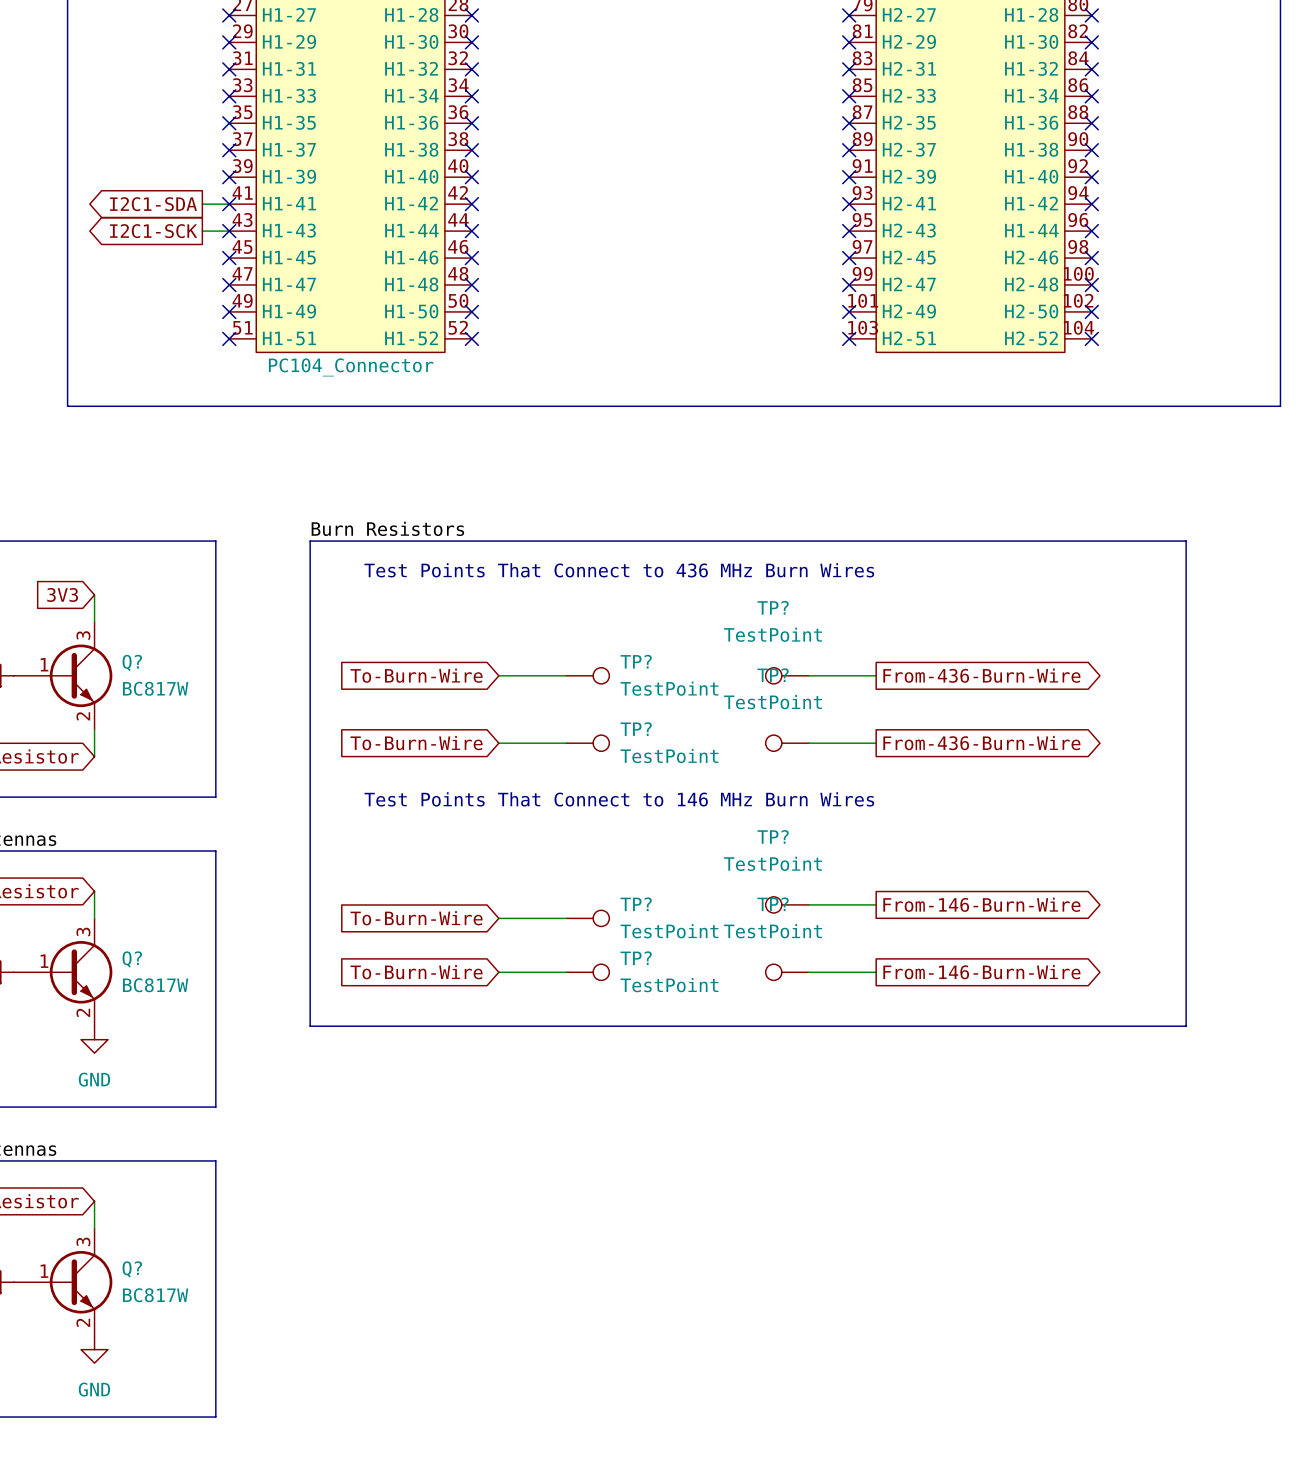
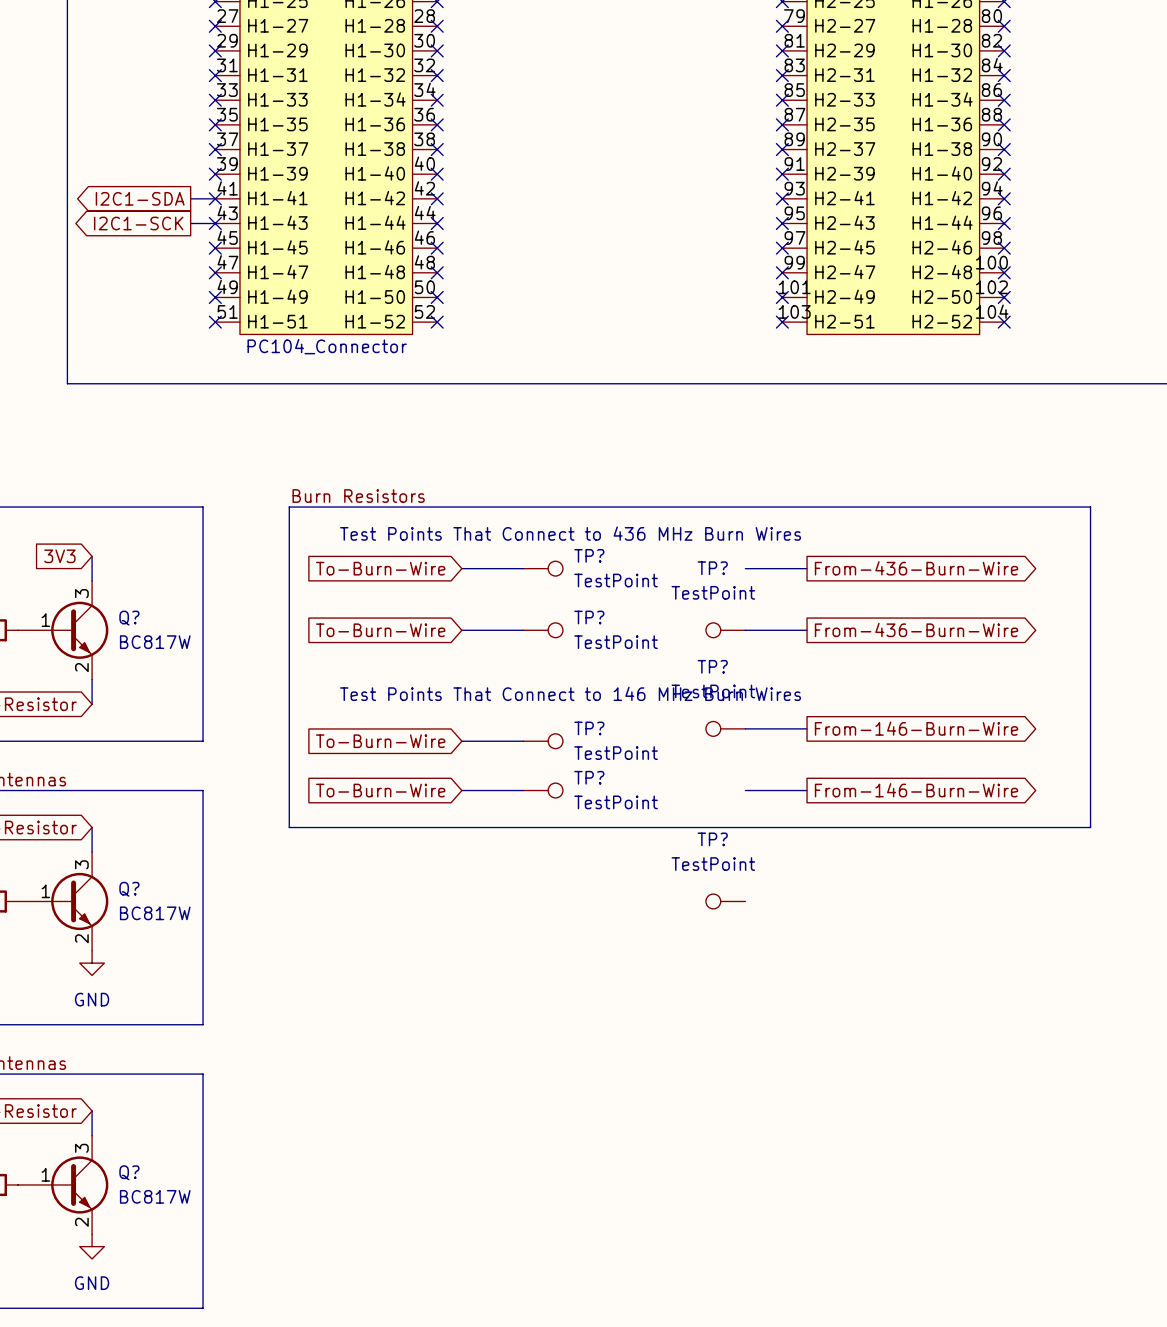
global label: none -> To-Burn-Wire (380, 568)
TP?: none -> TestPoint (543, 568)
global label: To-Burn-Wire (416, 743) -> none
wire: (498, 743) (566, 743) -> (461, 568) (523, 568)
TP?: TestPoint (587, 743) -> none
TP? position: (787, 743) -> (725, 728)
wire: (808, 743) (876, 743) -> (745, 568) (807, 568)
global label position: From-436-Burn-Wire (981, 743) -> From-436-Burn-Wire (916, 568)
global label: none -> From-146-Burn-Wire (916, 728)
global label: none -> To-Burn-Wire (380, 741)
TP?: none -> TestPoint (543, 741)
text position: Test Points That Connect to 146 MHz Burn Wires (619, 799) -> Test Points That Connect to 146 MHz Burn Wires (570, 693)
global label: none -> To-Burn-Wire (380, 790)
TP?: none -> TestPoint (543, 790)
line: (310, 891) (310, 1026) (1186, 1026) (1186, 891) -> (289, 827) (1090, 827)
TP?: TestPoint (787, 904) -> none
wire: (808, 904) (876, 904) -> (745, 728) (807, 728)
global label position: From-146-Burn-Wire (981, 904) -> From-146-Burn-Wire (916, 790)
global label: To-Burn-Wire (416, 918) -> none
wire: (498, 918) (566, 918) -> (461, 741) (523, 741)
TP?: TestPoint (587, 918) -> none
global label: To-Burn-Wire (416, 972) -> none
wire: (498, 972) (566, 972) -> (461, 790) (523, 790)
TP?: TestPoint (587, 972) -> none
wire: (808, 972) (876, 972) -> (745, 790) (807, 790)
global label: From-146-Burn-Wire (981, 972) -> none

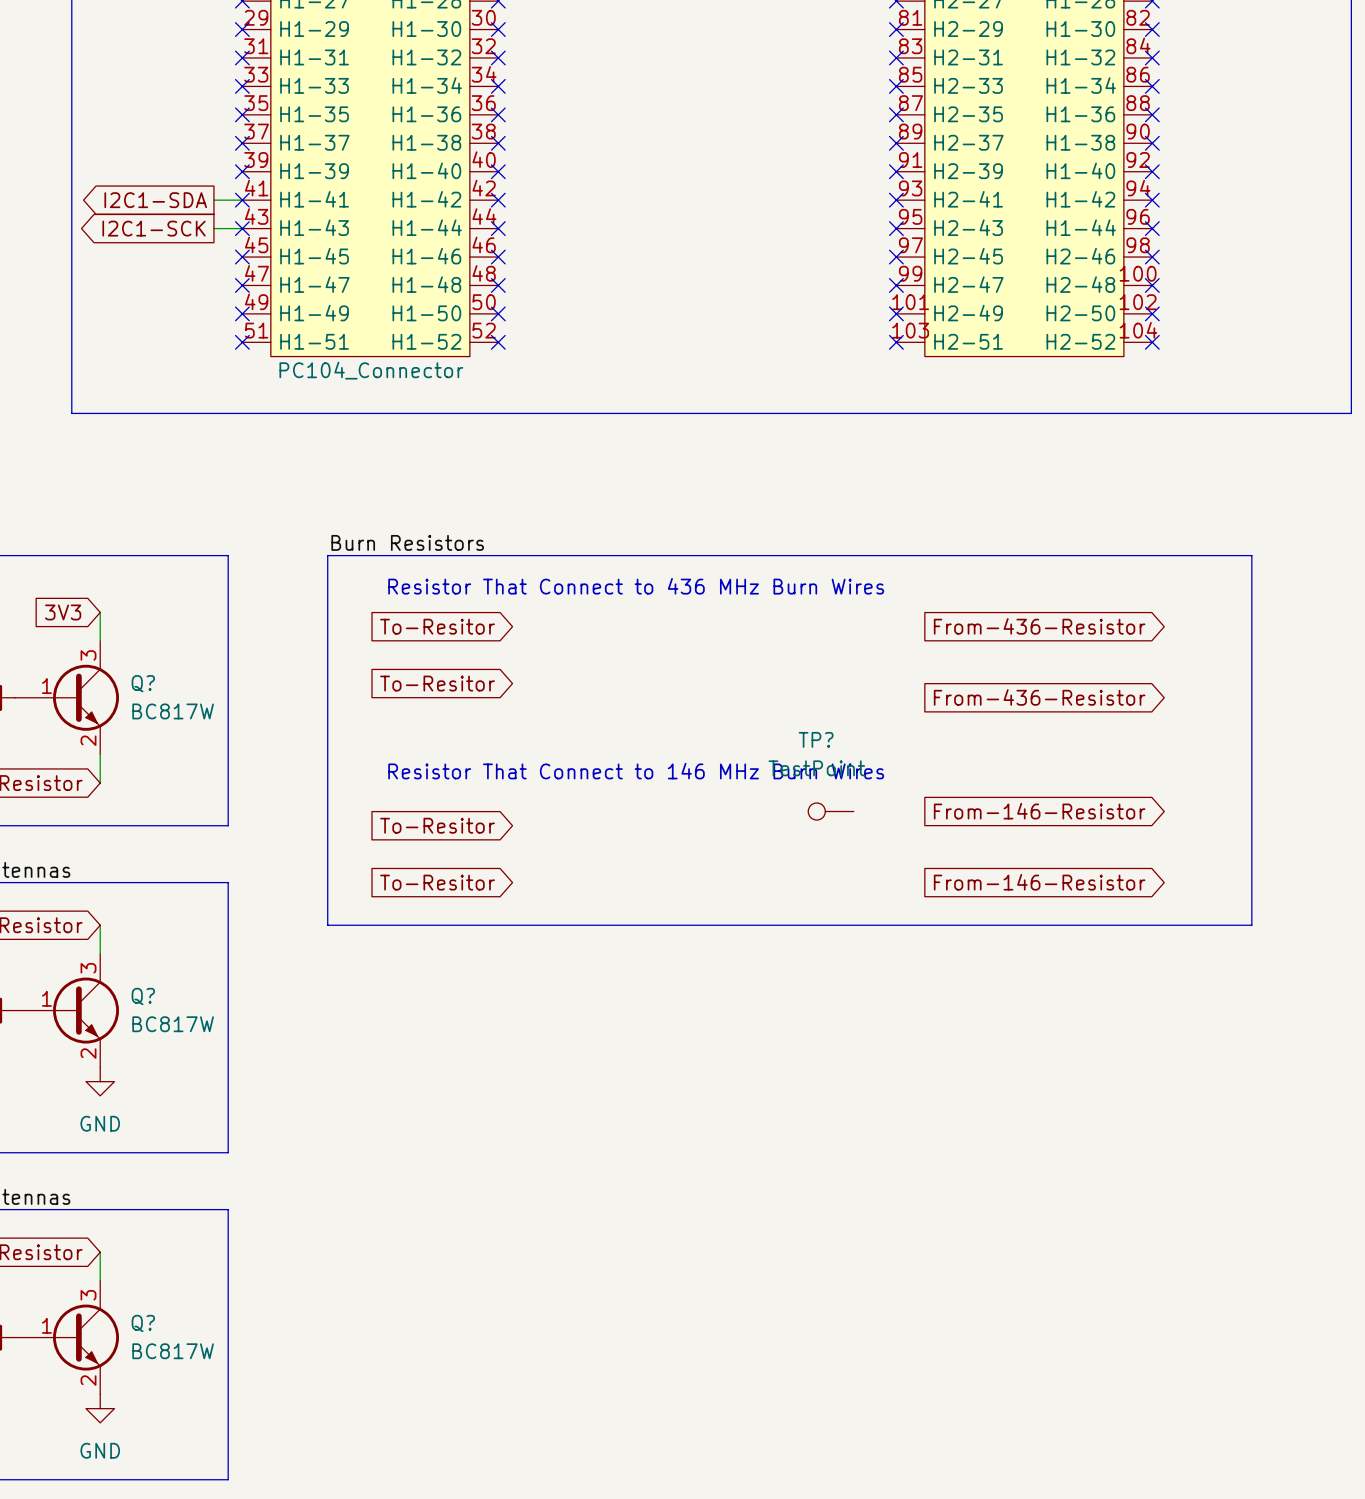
text: Test Points That Connect to 436 MHz Burn Wires (570, 533) -> Resistor That Connect to 436 MHz Burn Wires (636, 586)
global label: To-Burn-Wire (380, 568) -> none
global label: none -> To-Resitor (437, 626)
wire: (461, 568) (523, 568) -> none
TP?: TestPoint (543, 568) -> none
wire: (745, 568) (807, 568) -> none
global label: From-436-Burn-Wire (916, 568) -> From-436-Resistor (1039, 626)
global label: none -> To-Resitor (437, 683)
global label: From-436-Burn-Wire (916, 629) -> From-436-Resistor (1039, 697)
global label: To-Burn-Wire (380, 630) -> none
wire: (461, 630) (523, 630) -> none
TP?: TestPoint (543, 630) -> none
TP?: TestPoint (725, 630) -> none
wire: (745, 630) (807, 630) -> none
text: Test Points That Connect to 146 MHz Burn Wires (570, 693) -> Resistor That Connect to 146 MHz Burn Wires (636, 771)
wire: (745, 728) (807, 728) -> none
global label: From-146-Burn-Wire (916, 728) -> From-146-Resistor (1039, 811)
global label: To-Burn-Wire (380, 741) -> none
global label: none -> To-Resitor (437, 825)
wire: (461, 741) (523, 741) -> none
TP?: TestPoint (543, 741) -> none
global label: To-Burn-Wire (380, 790) -> none
global label: none -> To-Resitor (437, 882)
wire: (461, 790) (523, 790) -> none
TP?: TestPoint (543, 790) -> none
wire: (745, 790) (807, 790) -> none
global label: From-146-Burn-Wire (916, 790) -> From-146-Resistor (1039, 882)
TP?: TestPoint (725, 901) -> none

